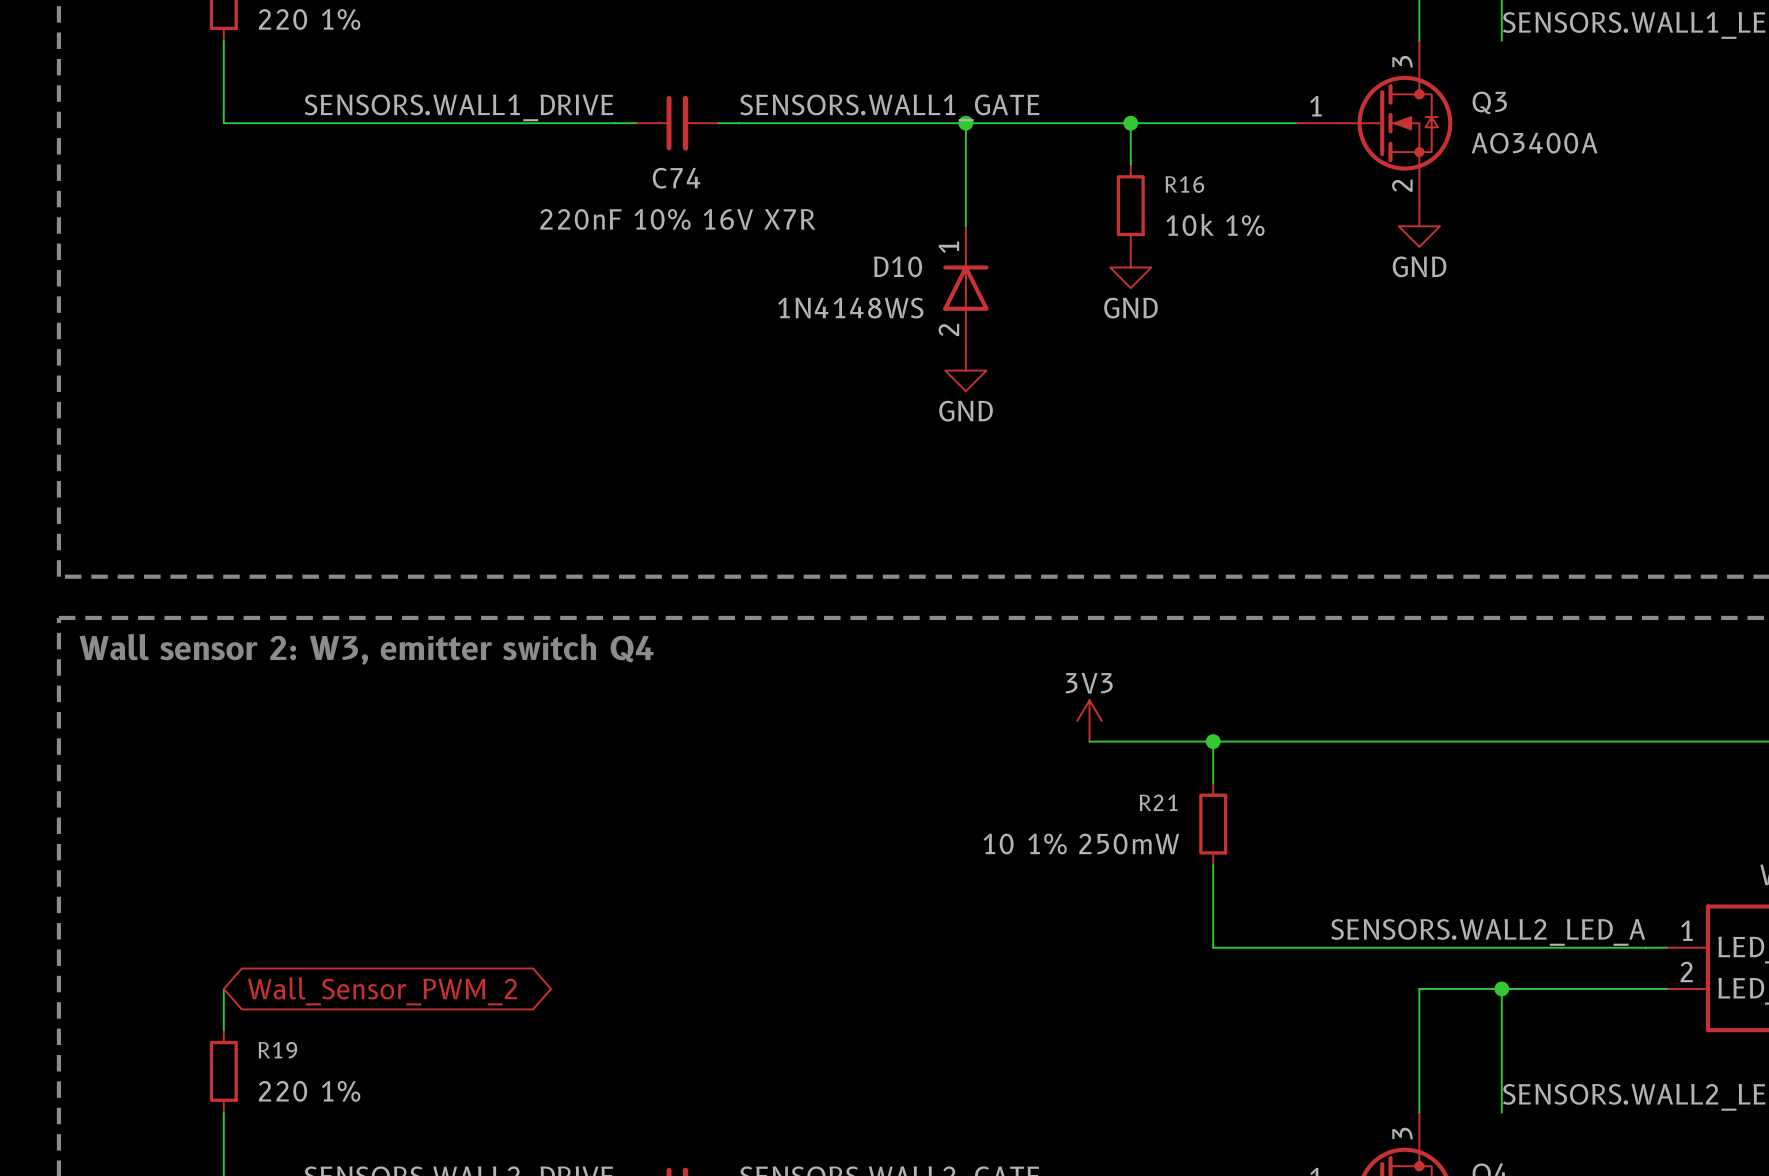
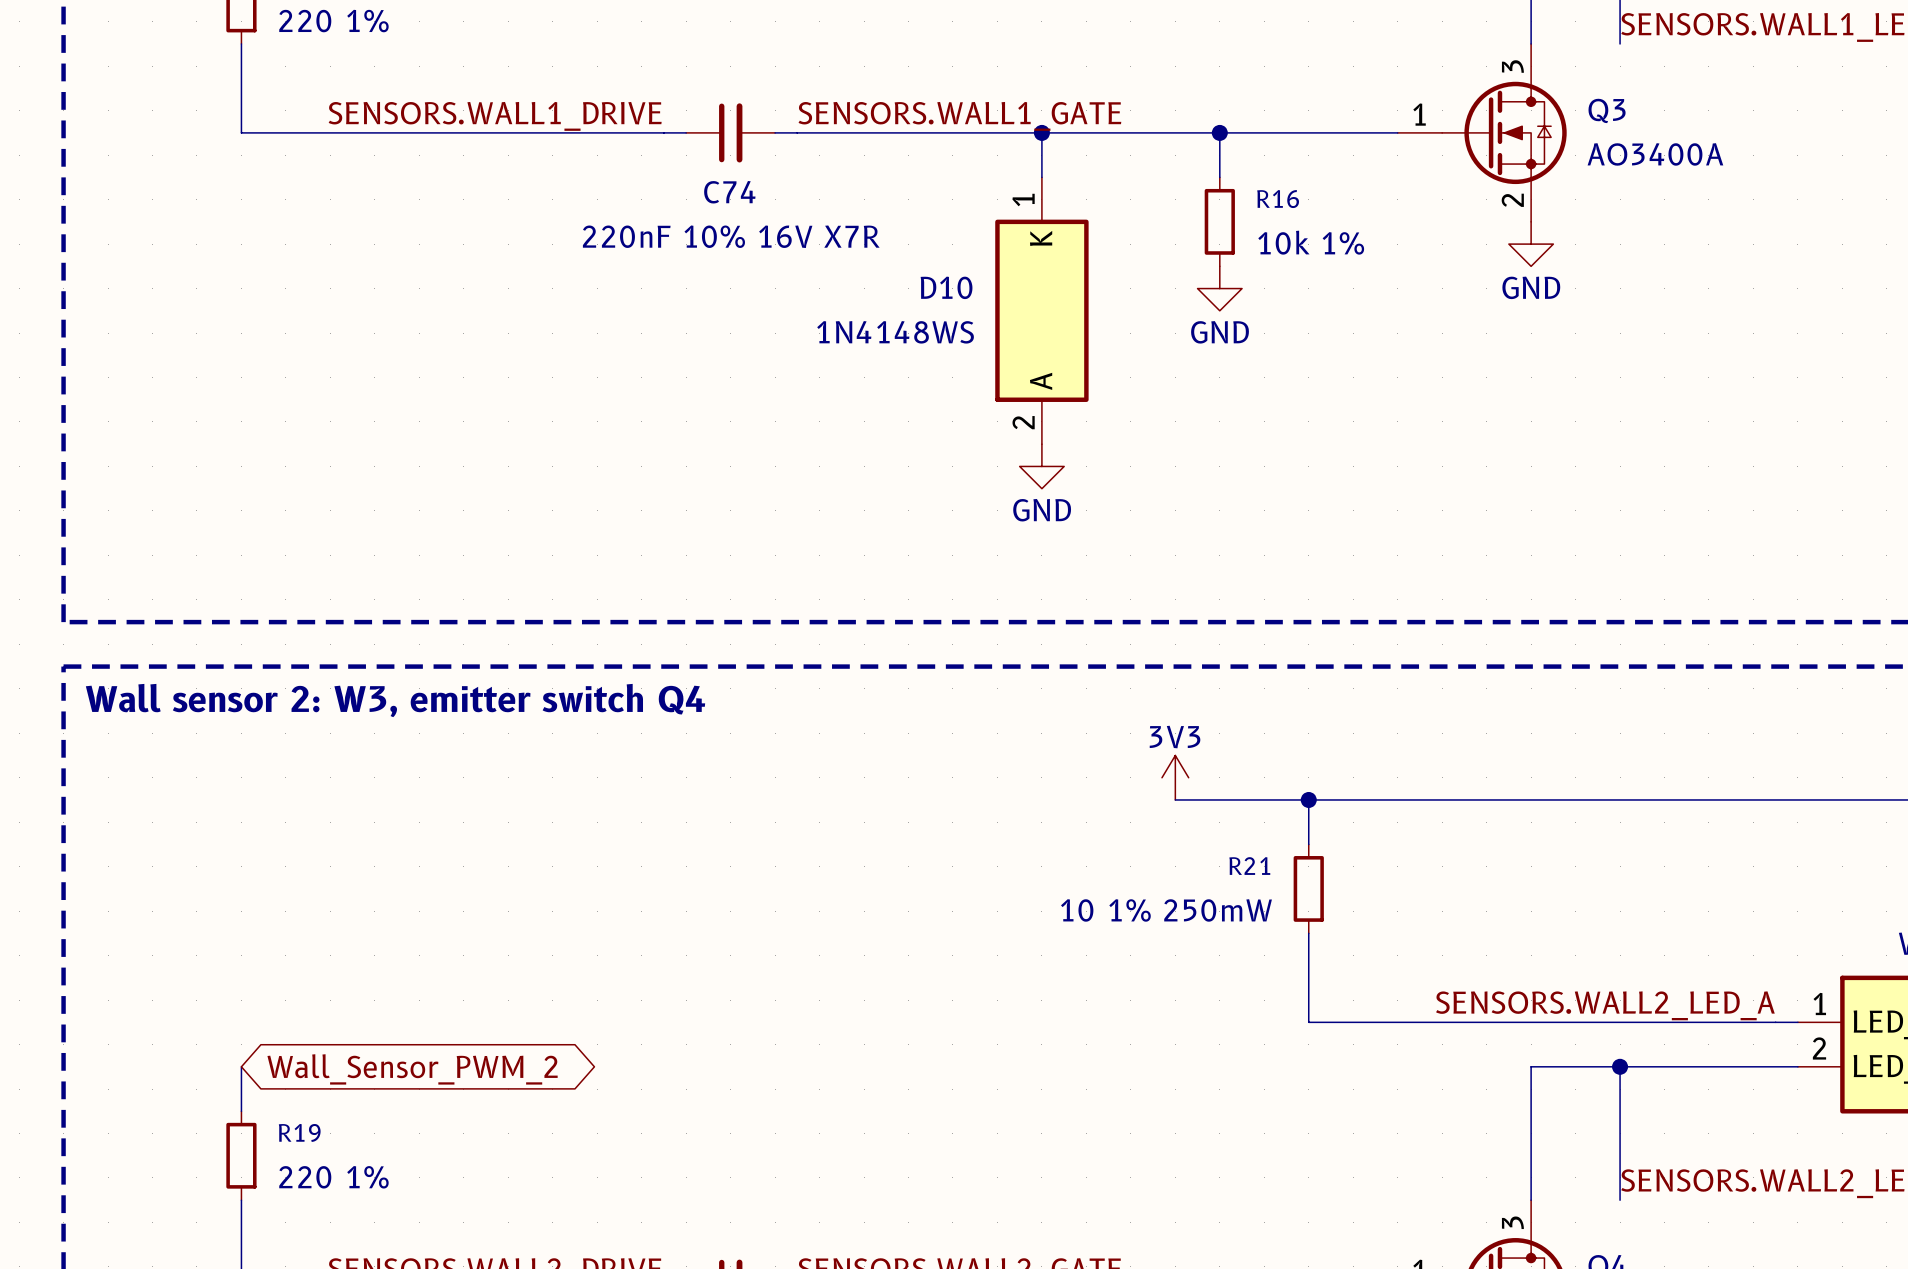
D10 symbol: [943, 226, 989, 350] -> [995, 177, 1089, 445]
power symbol position: GND (965, 370) -> GND (1041, 466)

